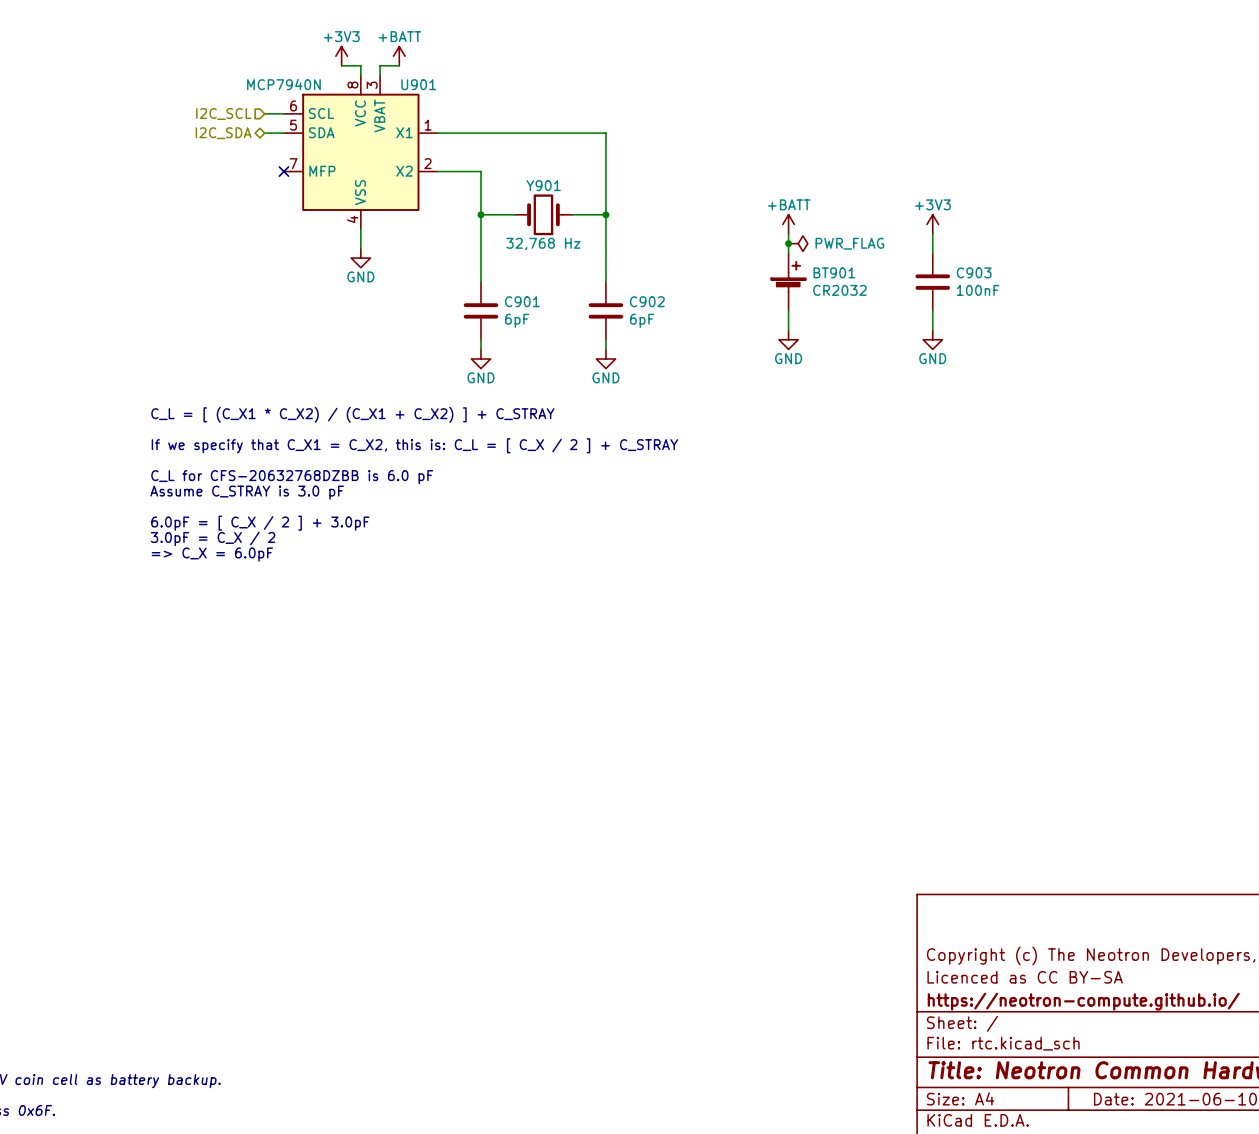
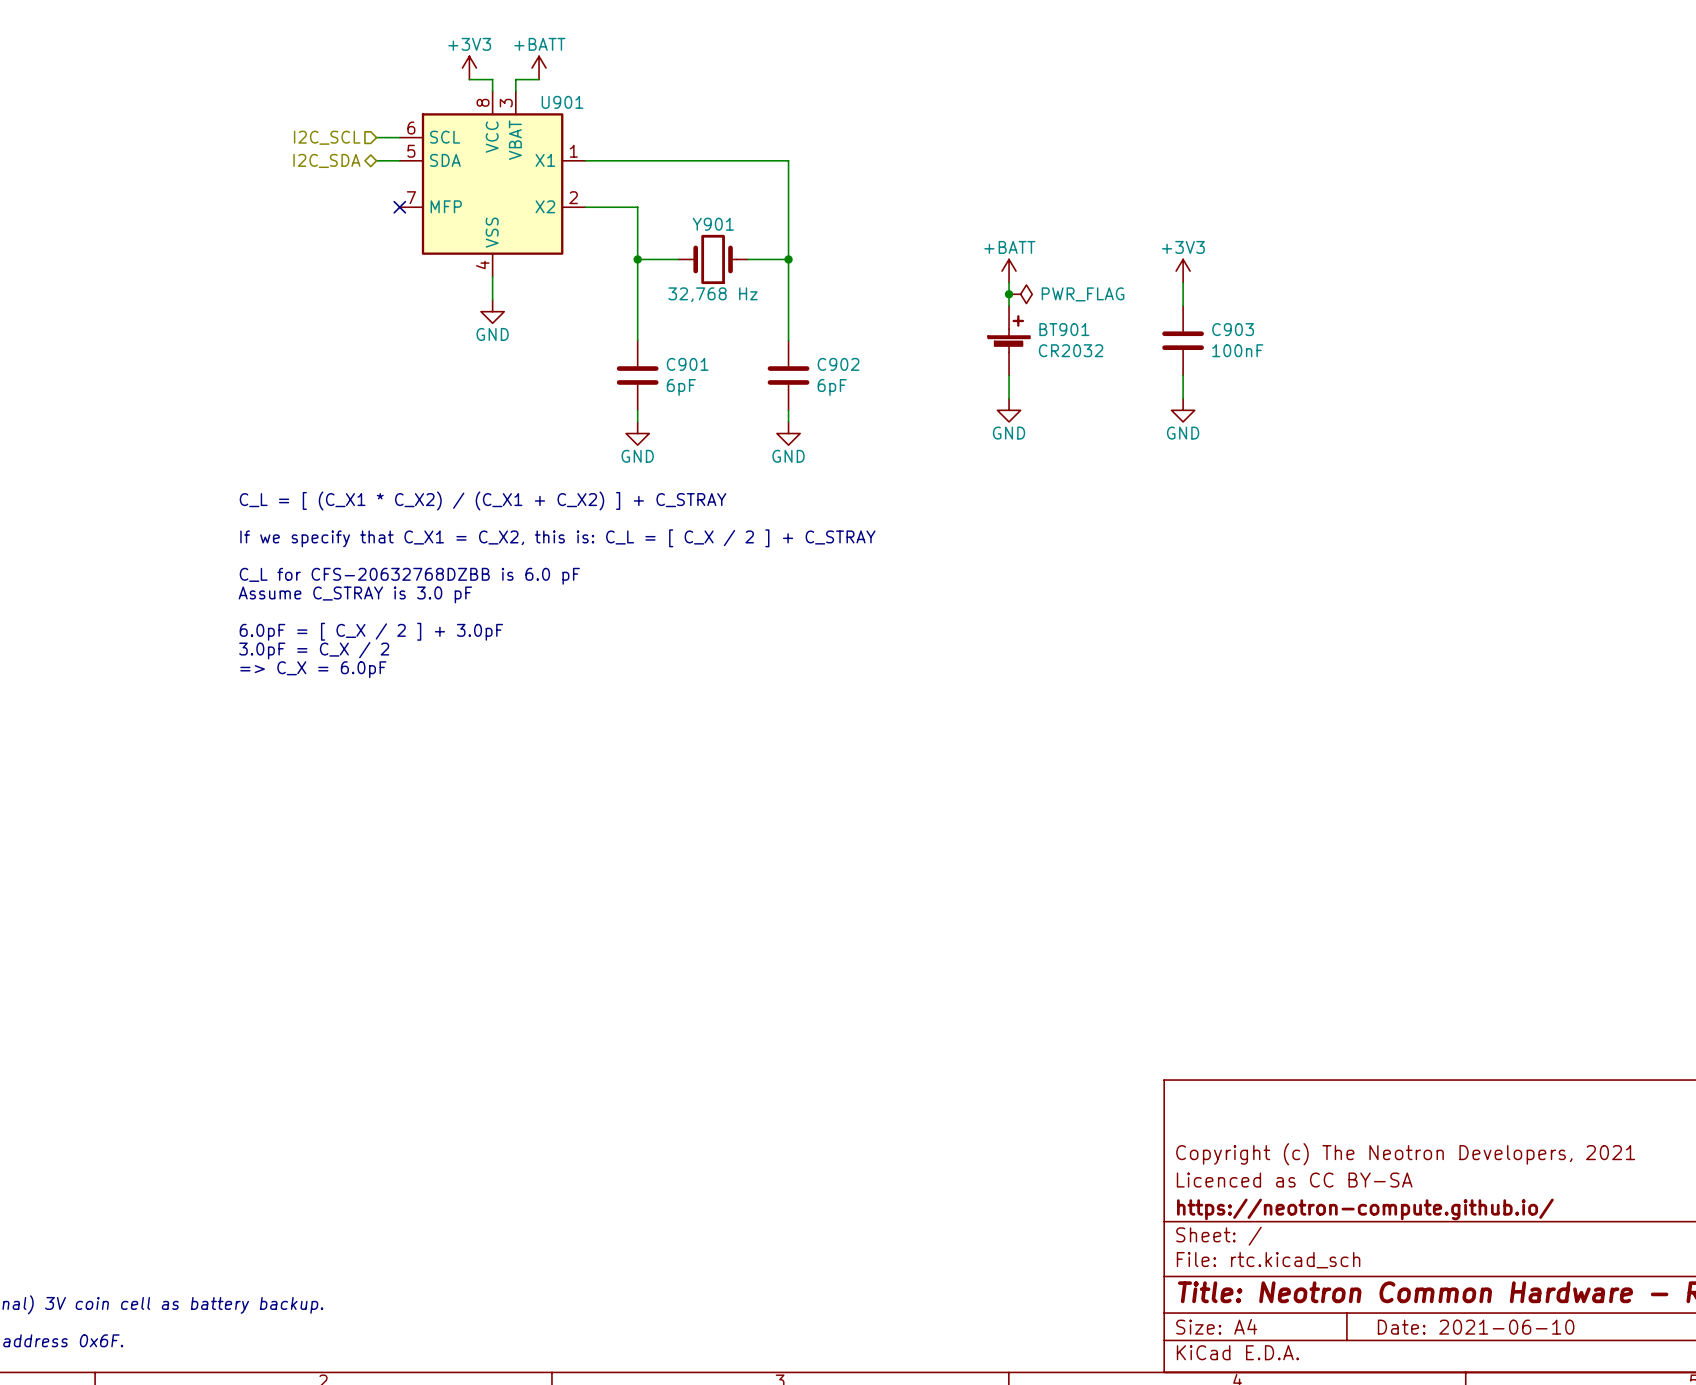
U901 value: MCP7940N (283, 84) -> none

